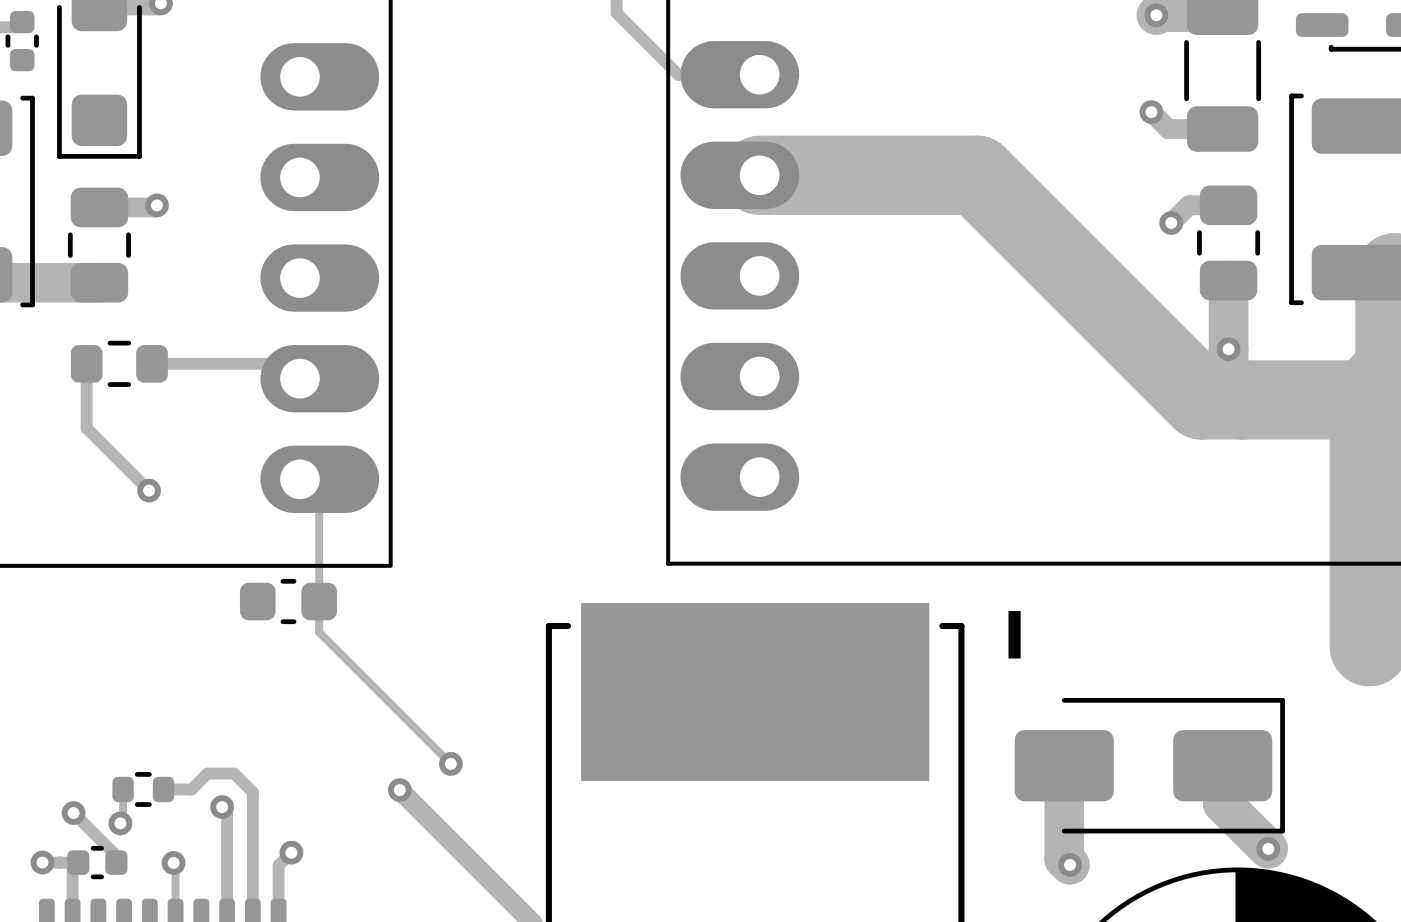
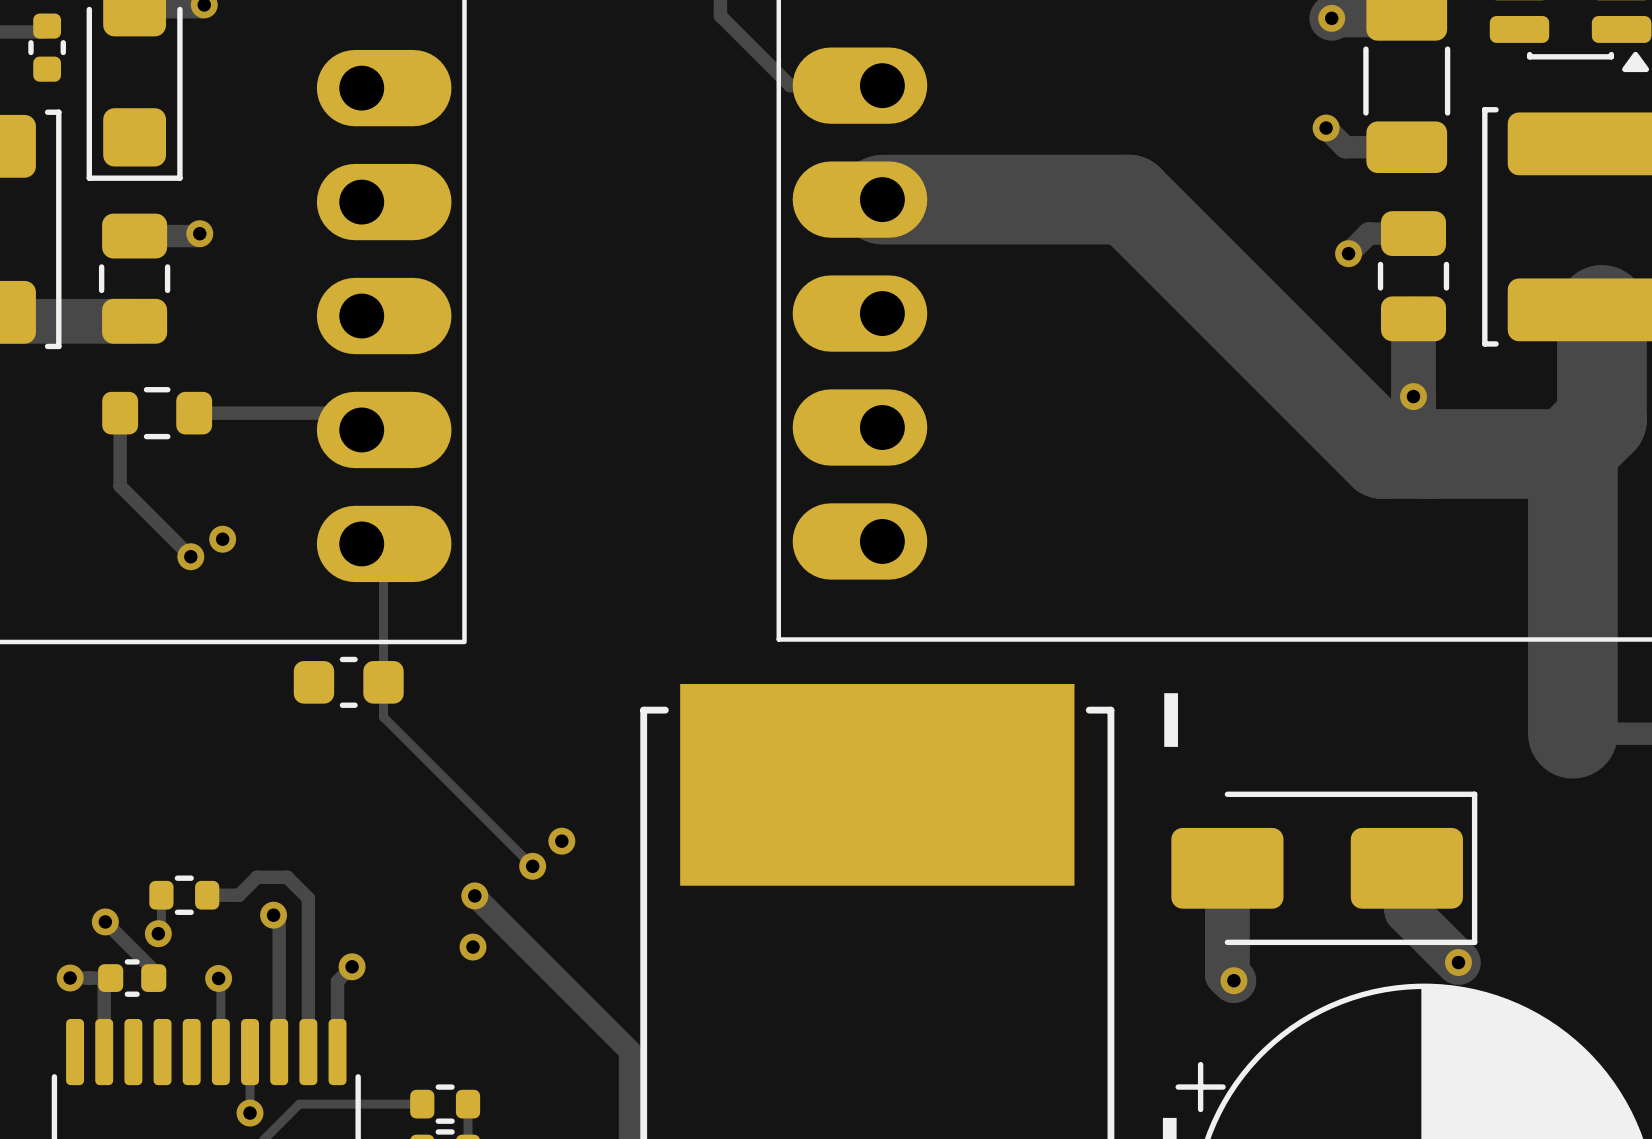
via: none -> (222, 539)
via: none -> (561, 841)
via: none -> (473, 947)

